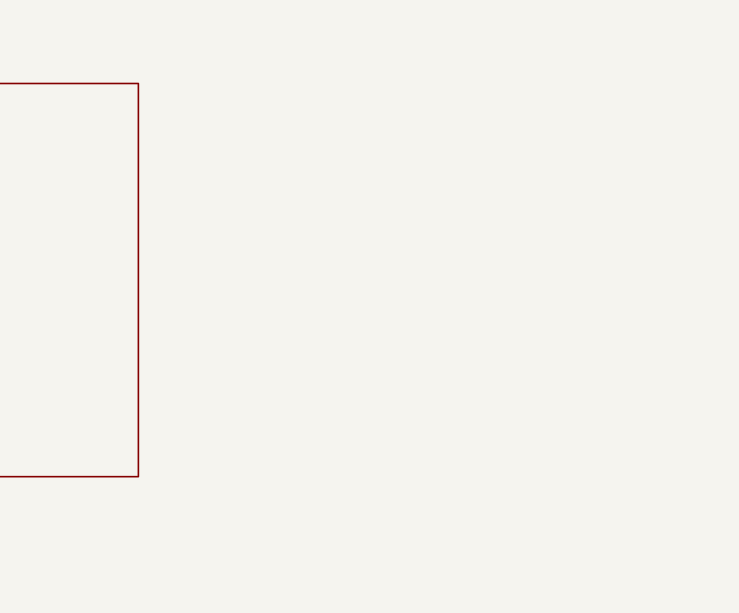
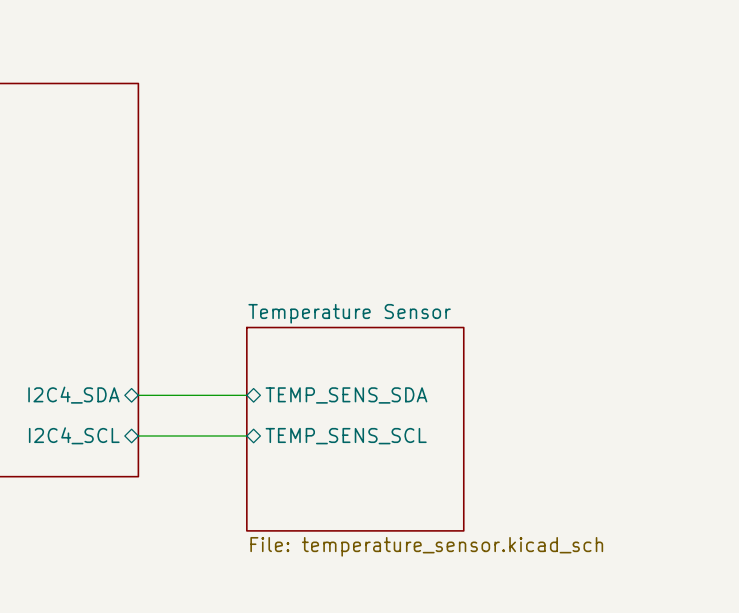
sheet pin: none -> I2C4_SDA (73, 395)
wire: none -> (138, 395) (246, 395)
sheet pin: none -> TEMP_SENS_SDA (346, 395)
sheet Temperature Sensor: none -> File: temperature_sensor.kicad_sch (355, 429)
sheet pin: none -> I2C4_SCL (74, 435)
wire: none -> (138, 435) (246, 435)
sheet pin: none -> TEMP_SENS_SCL (346, 436)

